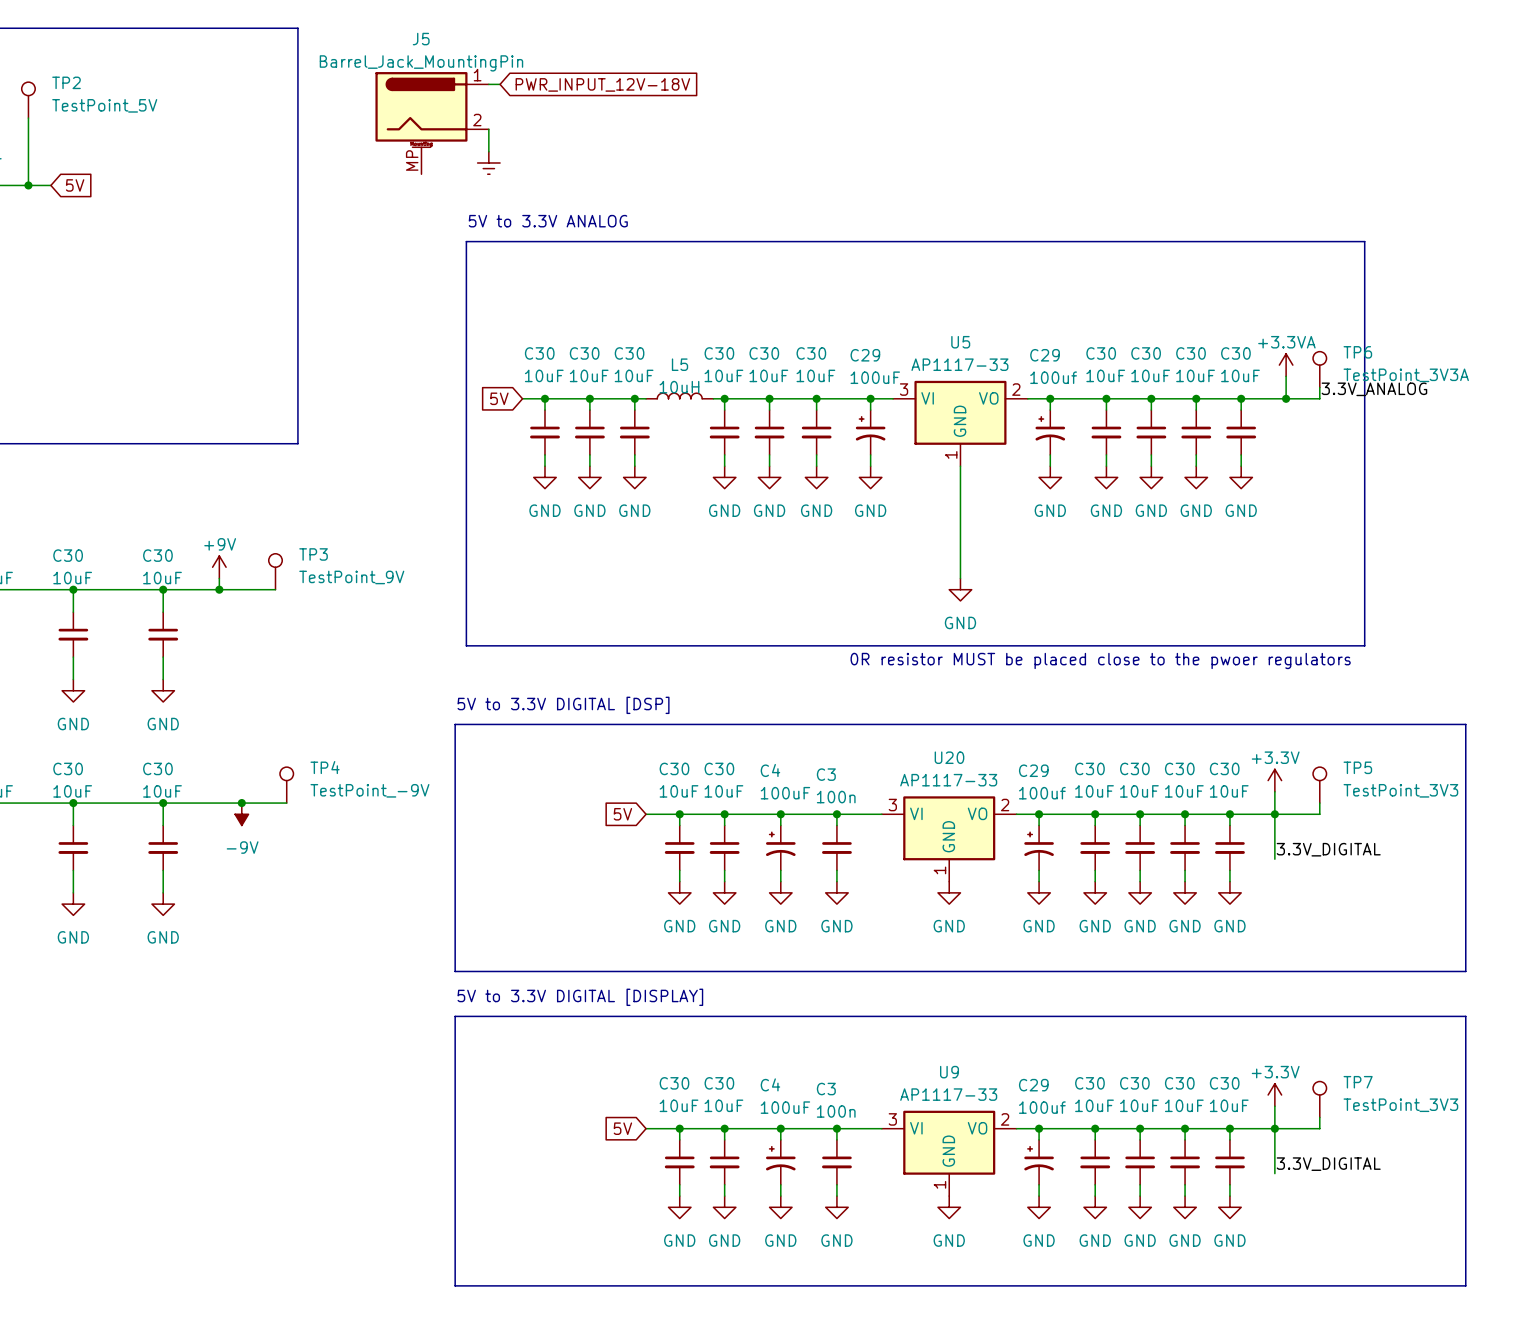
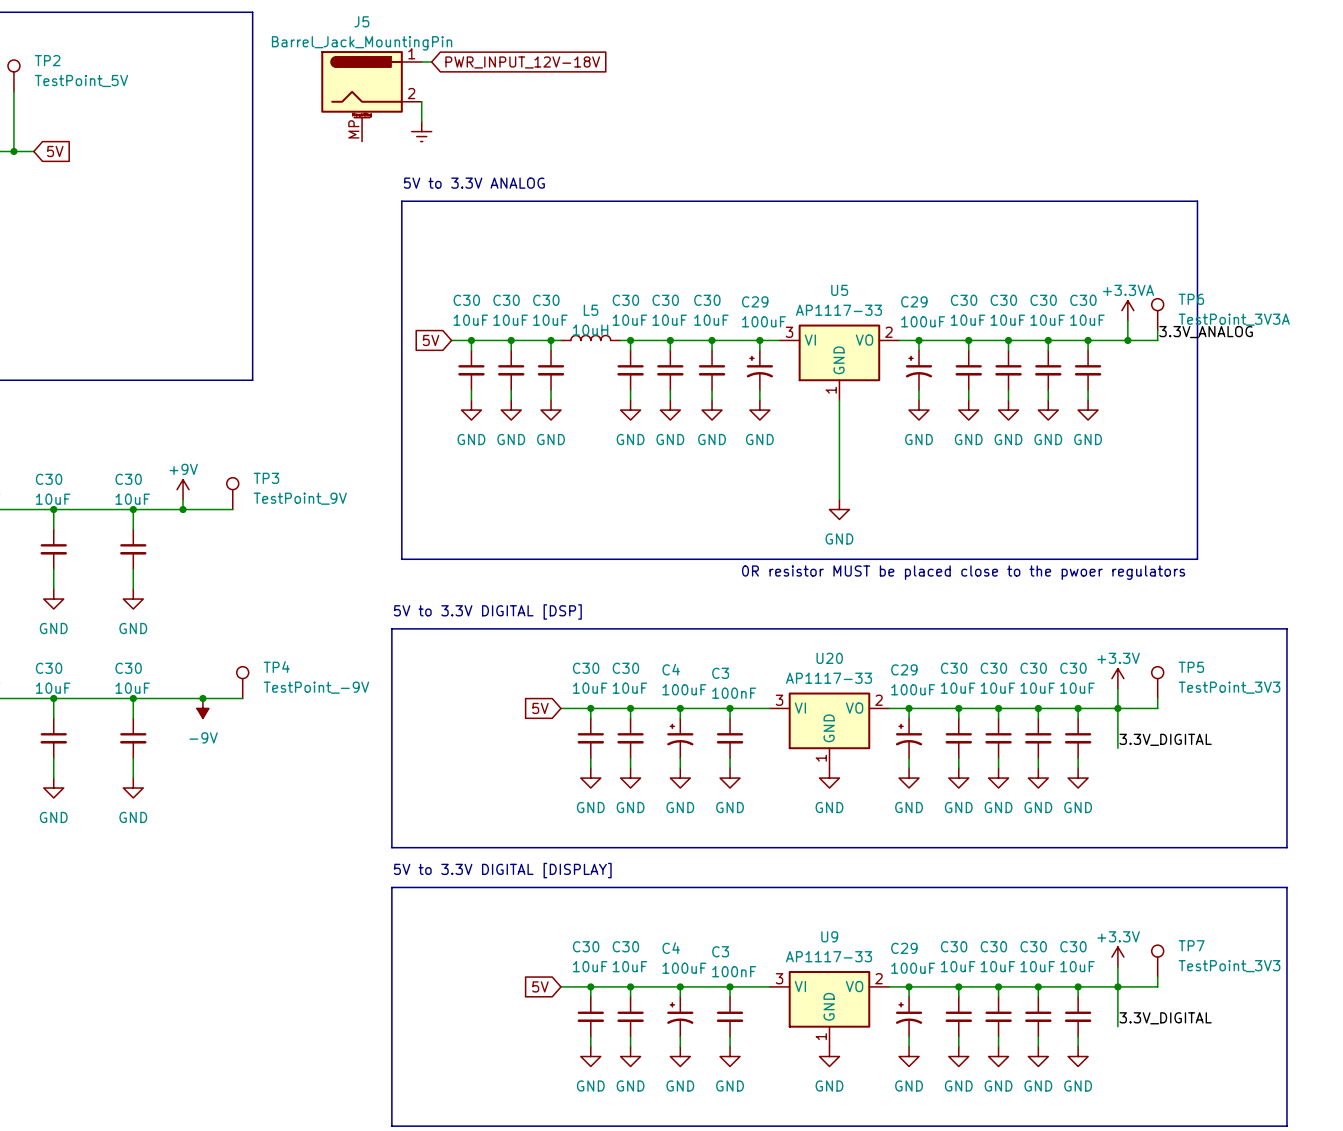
C29 value: 100uf (1053, 377) -> 100uF (923, 321)
C29 value: 100uf (1042, 793) -> 100uF (913, 689)
C3 value: 100n (836, 797) -> 100nF (734, 693)
C29 value: 100uf (1042, 1107) -> 100uF (913, 968)
C3 value: 100n (836, 1111) -> 100nF (734, 971)

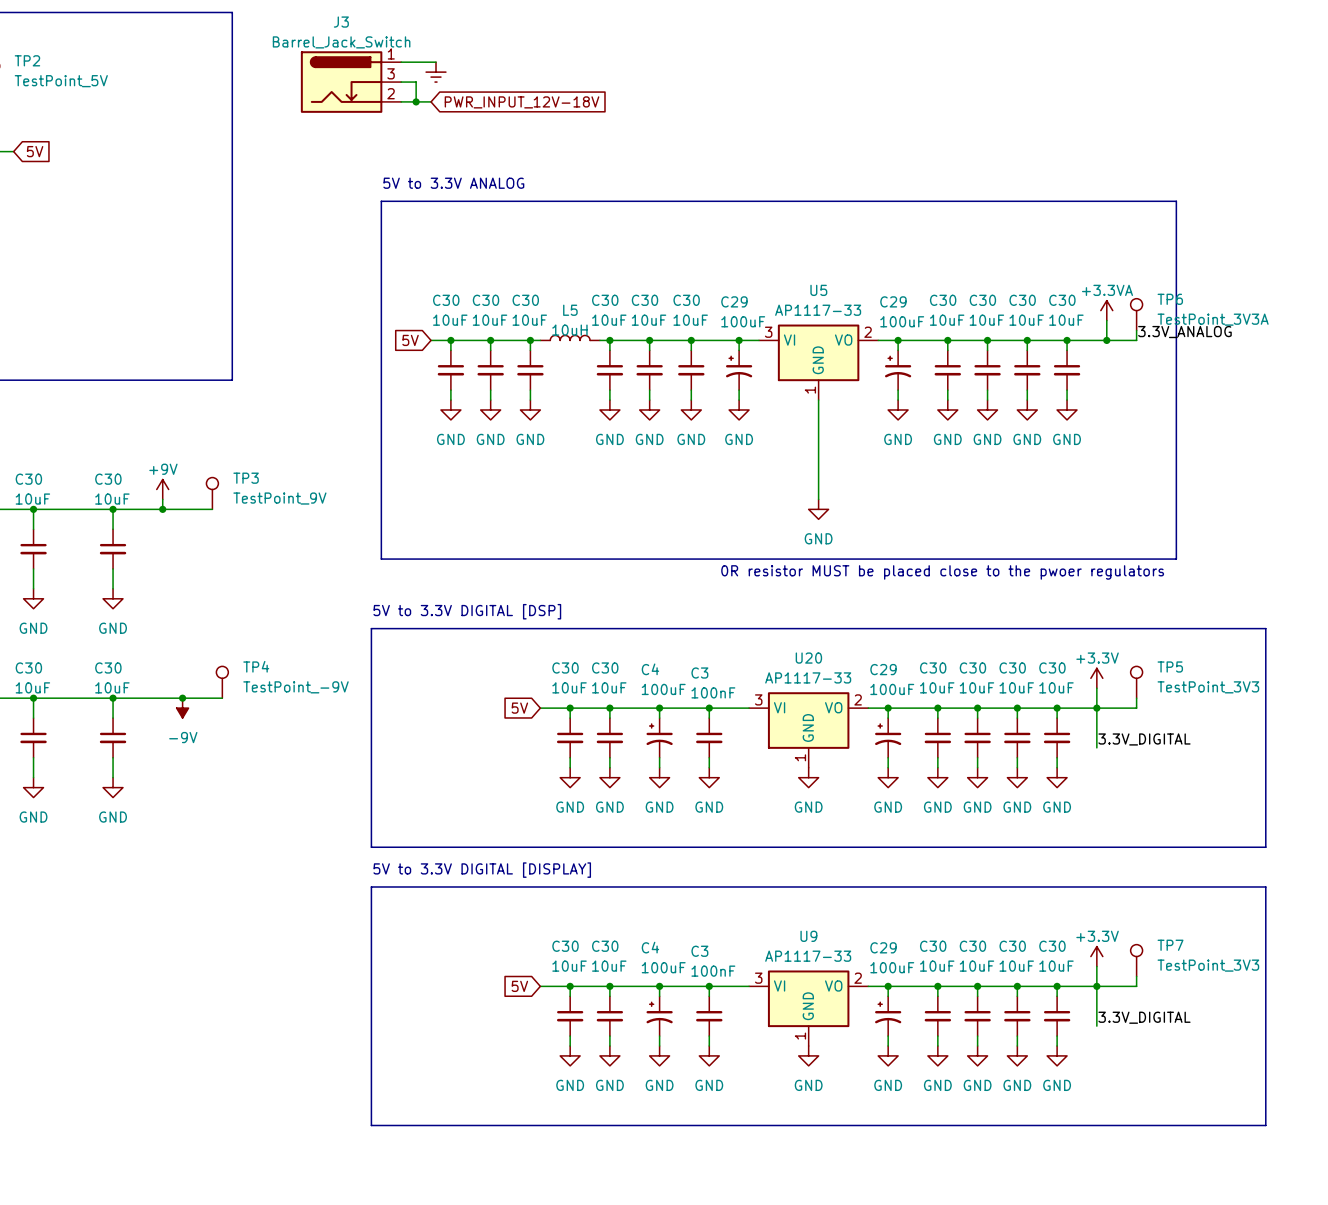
wire: none -> (411, 62) (436, 62)
global label position: PWR_INPUT_12V-18V (522, 62) -> PWR_INPUT_12V-18V (522, 102)
J3: none -> Barrel_Jack_Switch (351, 82)
wire: none -> (401, 82) (416, 82) (416, 101)
J5: Barrel_Jack_MountingPin (371, 96) -> none
wire: (421, 101) (421, 121) -> (401, 101) (431, 101)
junction: none -> (416, 101)
power symbol position: (421, 131) -> (436, 72)

